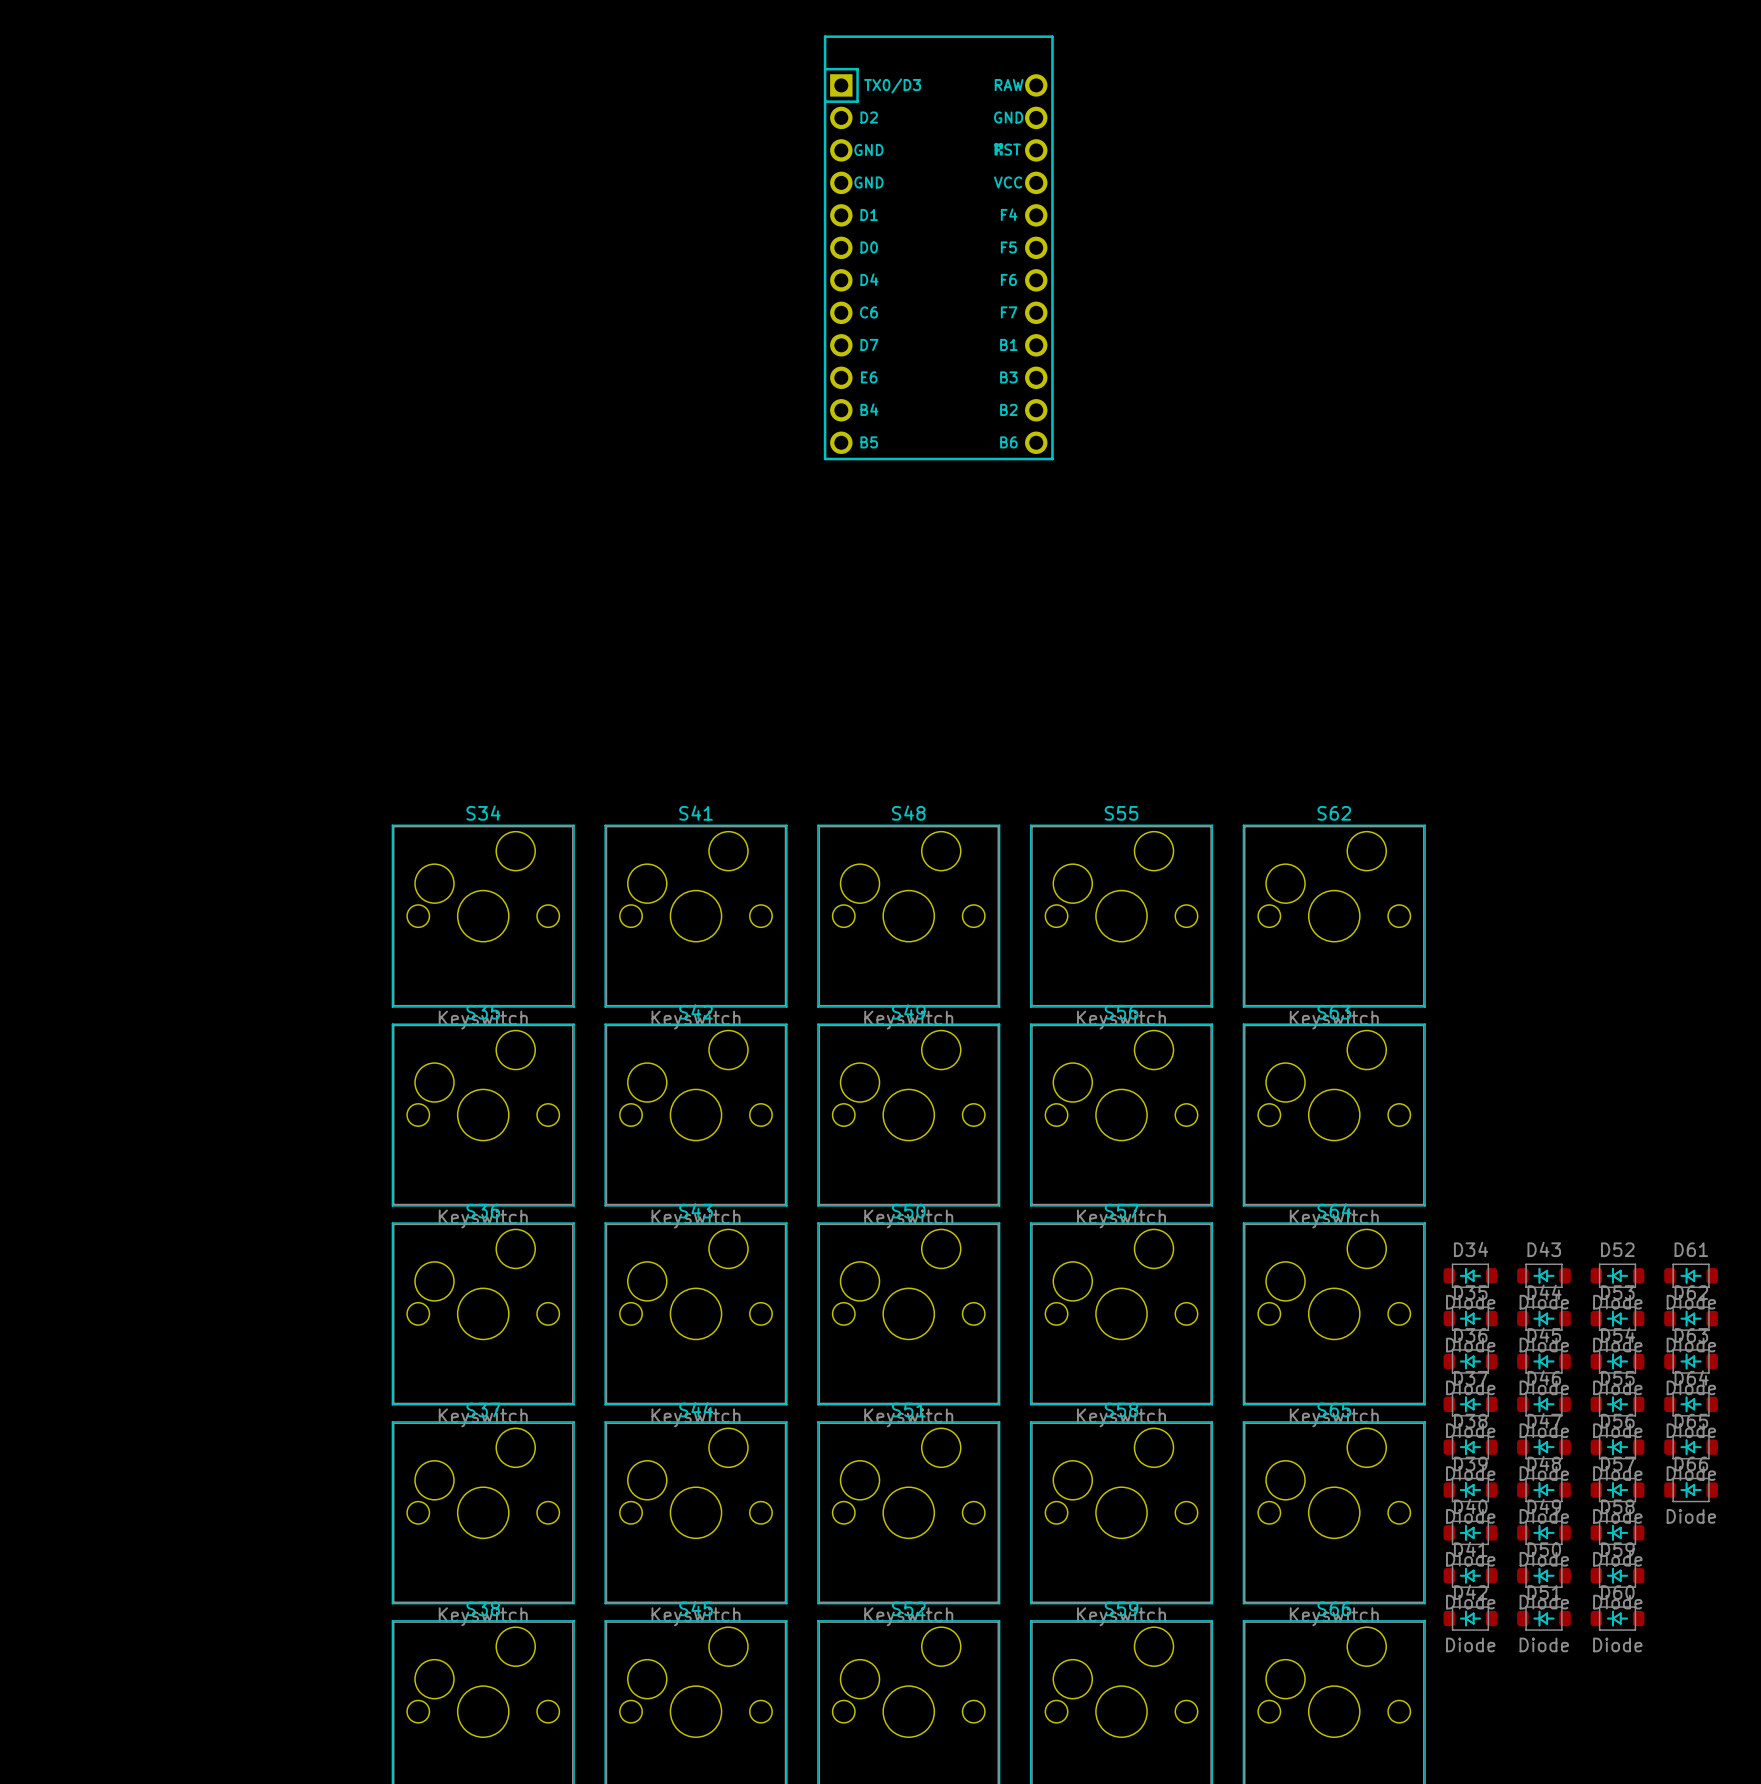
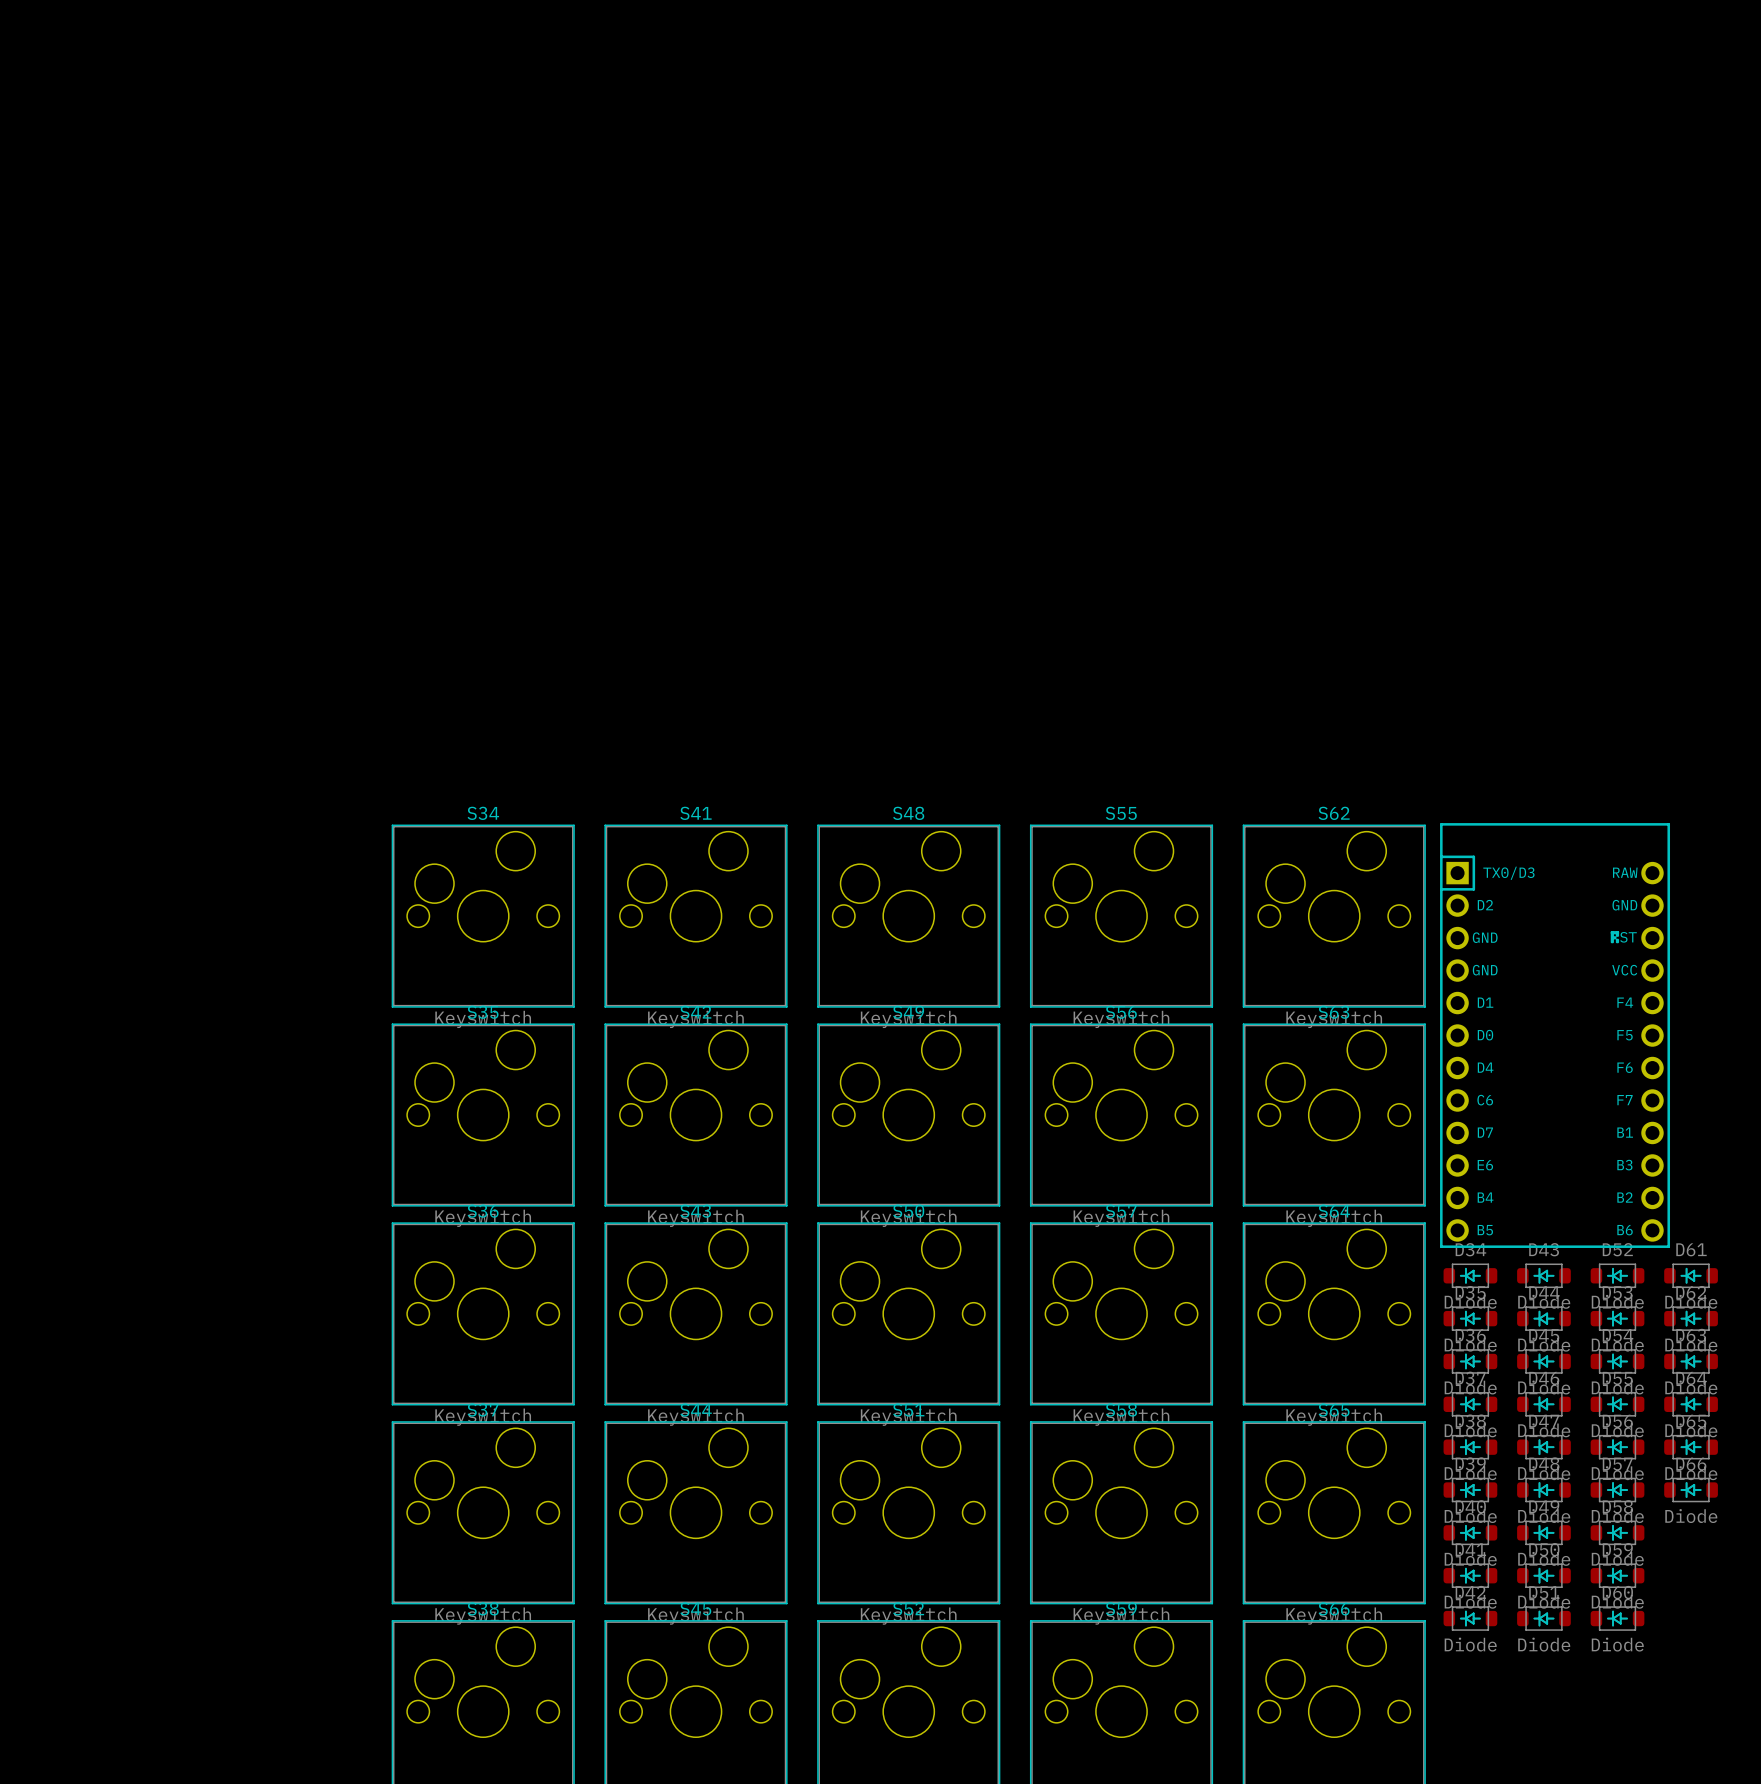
part: (938, 247) -> none
part: none -> (1555, 1035)

